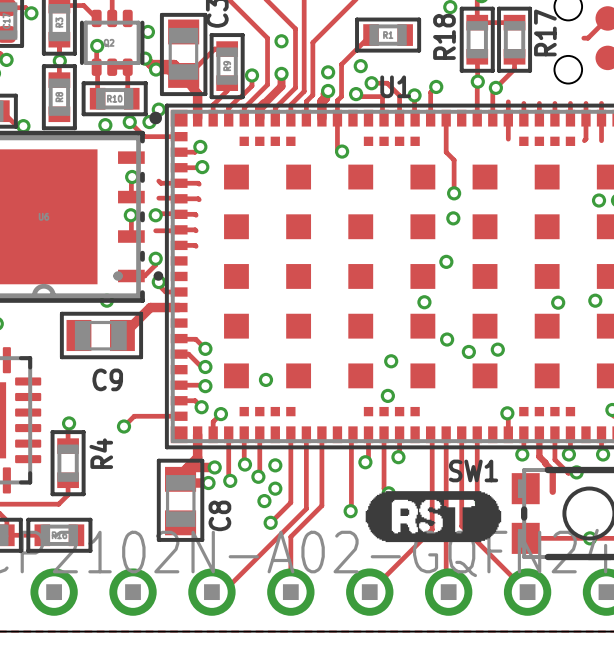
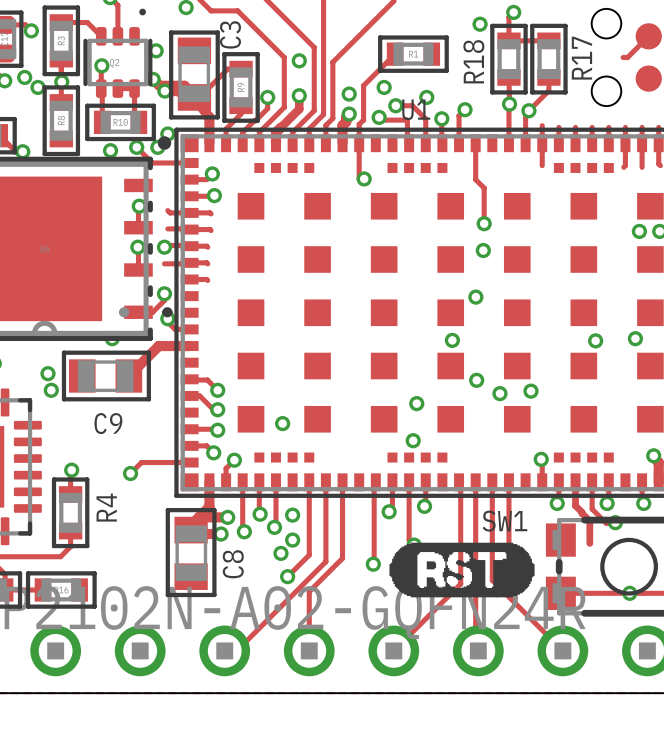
via: none -> (24, 77)
via: none -> (38, 87)
via: none -> (426, 97)
via: none -> (48, 373)
via: none -> (51, 390)

